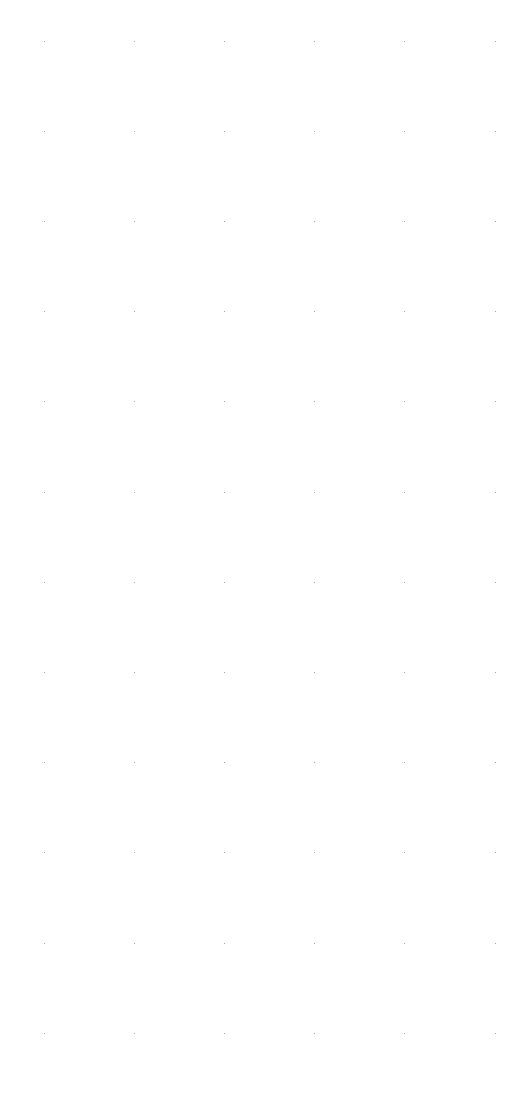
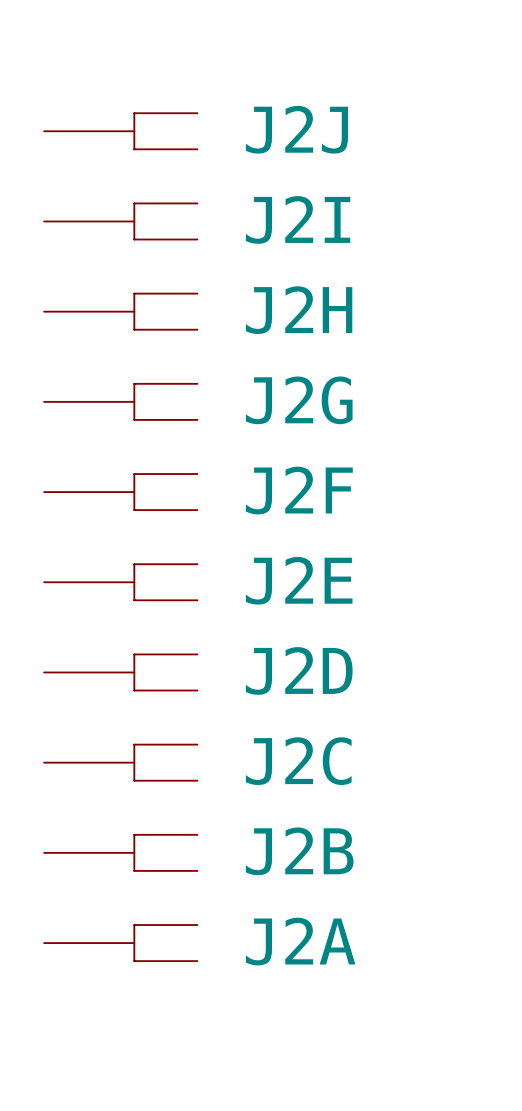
J2J: none -> (120, 131)
J2I: none -> (120, 221)
J2H: none -> (120, 311)
J2G: none -> (120, 401)
J2F: none -> (120, 492)
J2E: none -> (120, 582)
J2D: none -> (120, 672)
J2C: none -> (120, 762)
J2B: none -> (120, 852)
J2A: none -> (120, 943)

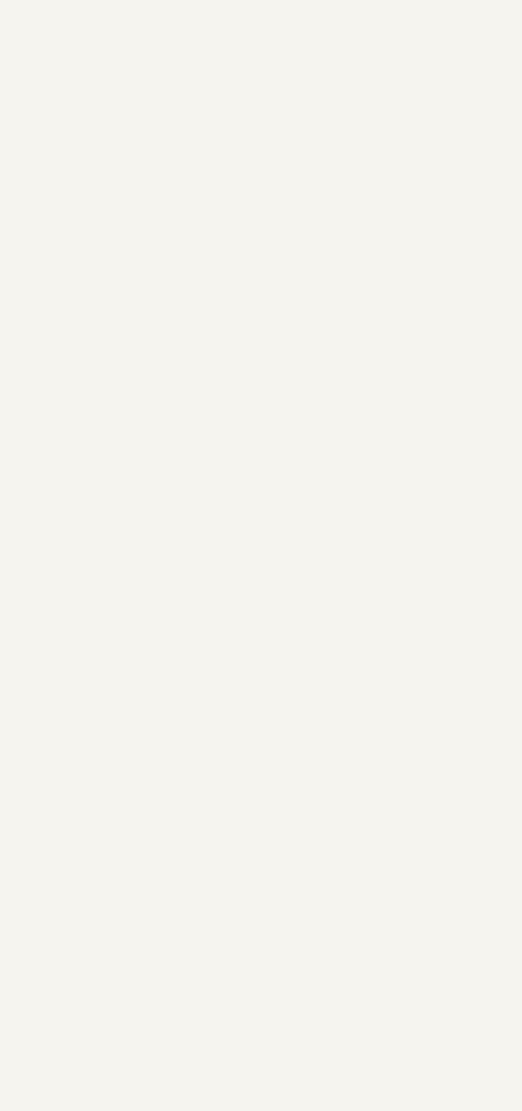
J2J: (120, 131) -> none
J2I: (120, 221) -> none
J2H: (120, 311) -> none
J2G: (120, 401) -> none
J2F: (120, 492) -> none
J2E: (120, 582) -> none
J2D: (120, 672) -> none
J2C: (120, 762) -> none
J2B: (120, 852) -> none
J2A: (120, 943) -> none

